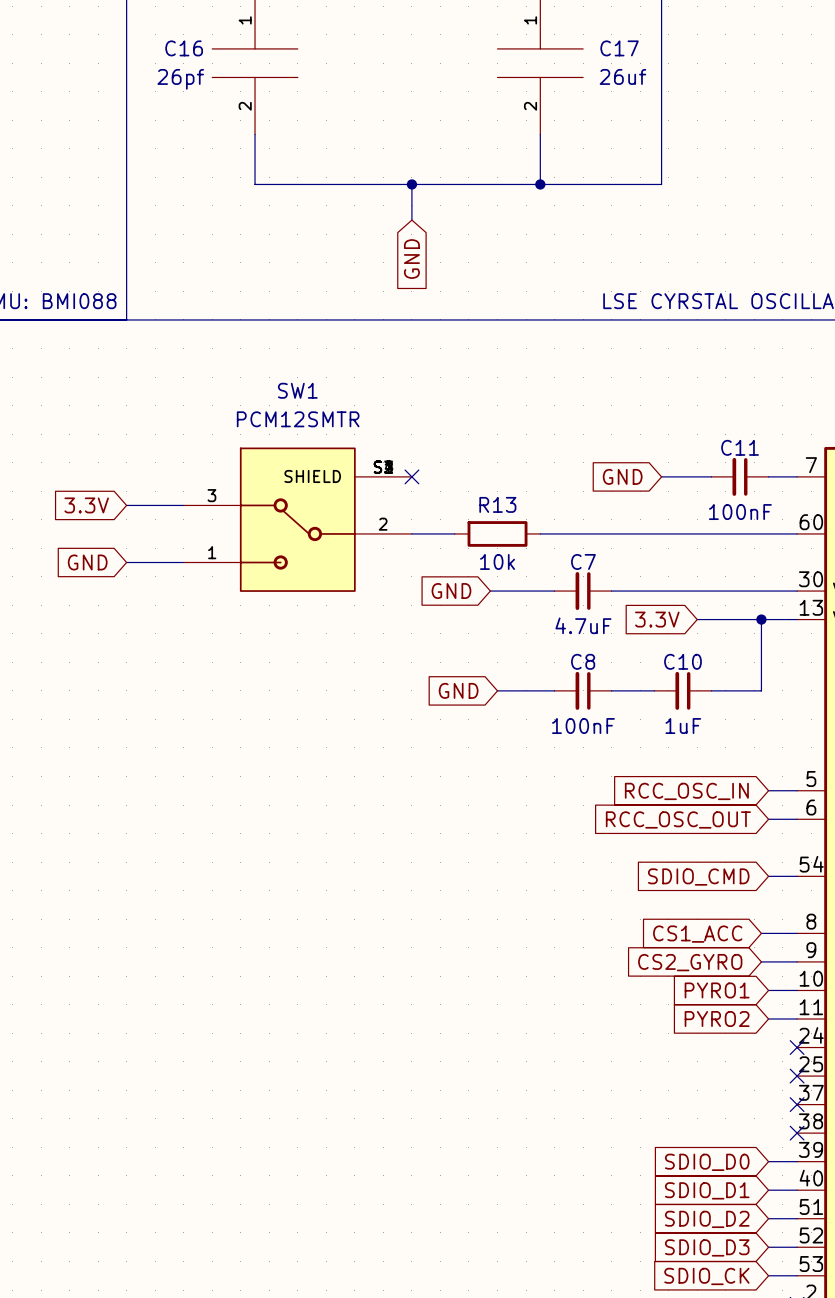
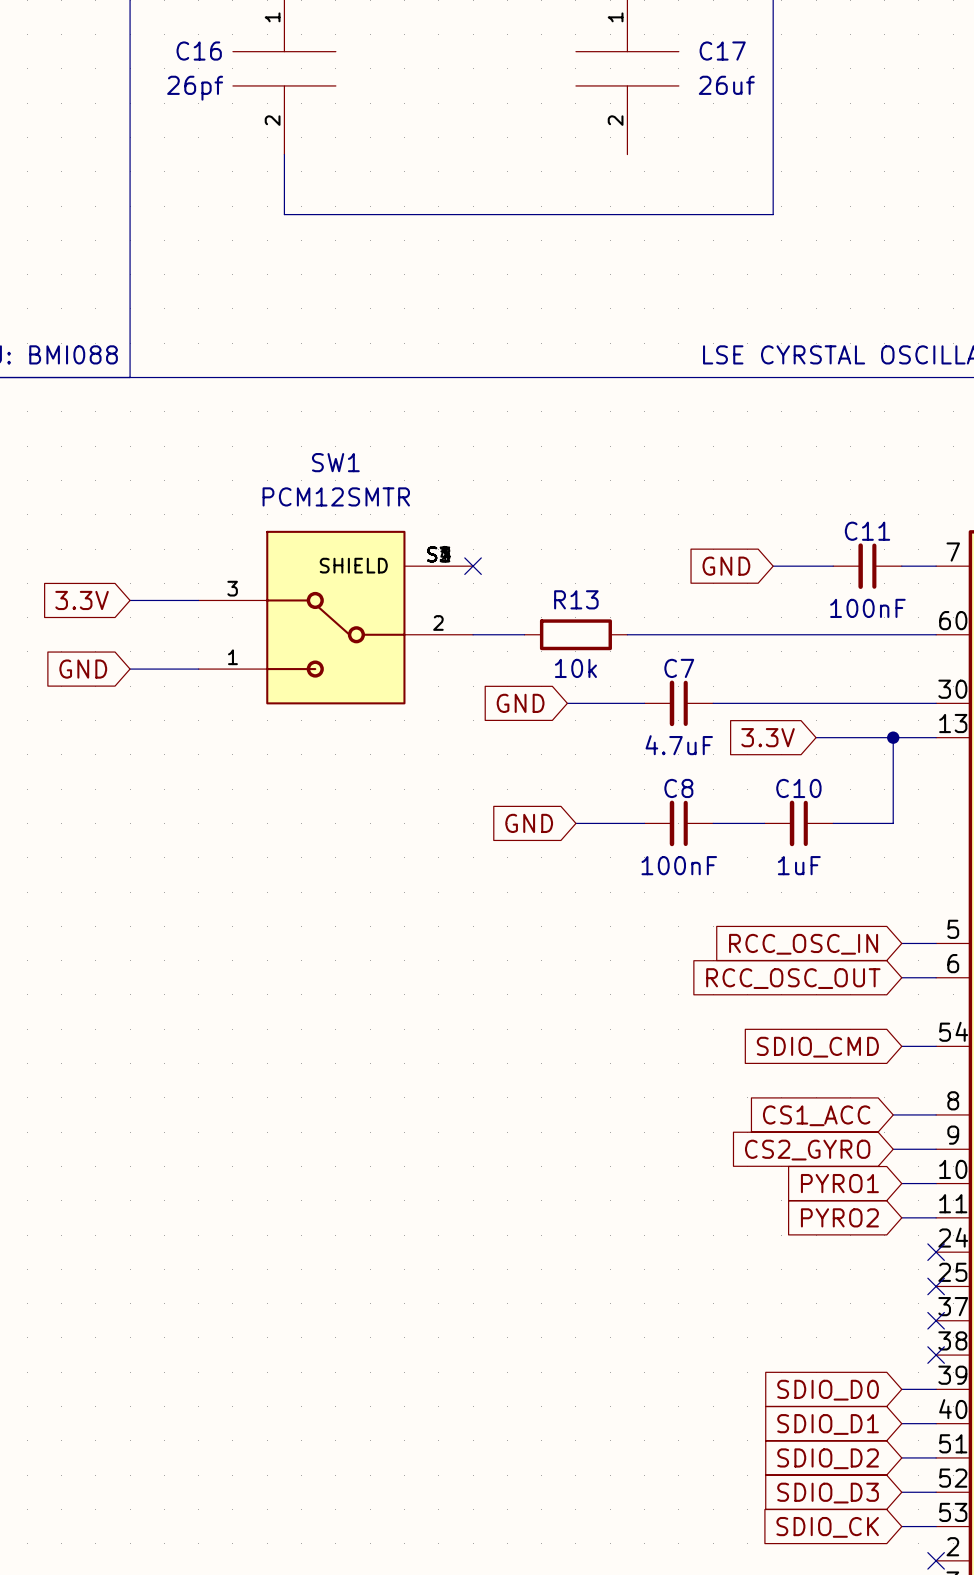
wire: (540, 134) (540, 184) -> none
wire: (411, 184) (411, 220) -> none
junction: (411, 184) -> none
junction: (540, 184) -> none
global label: GND (411, 259) -> none

